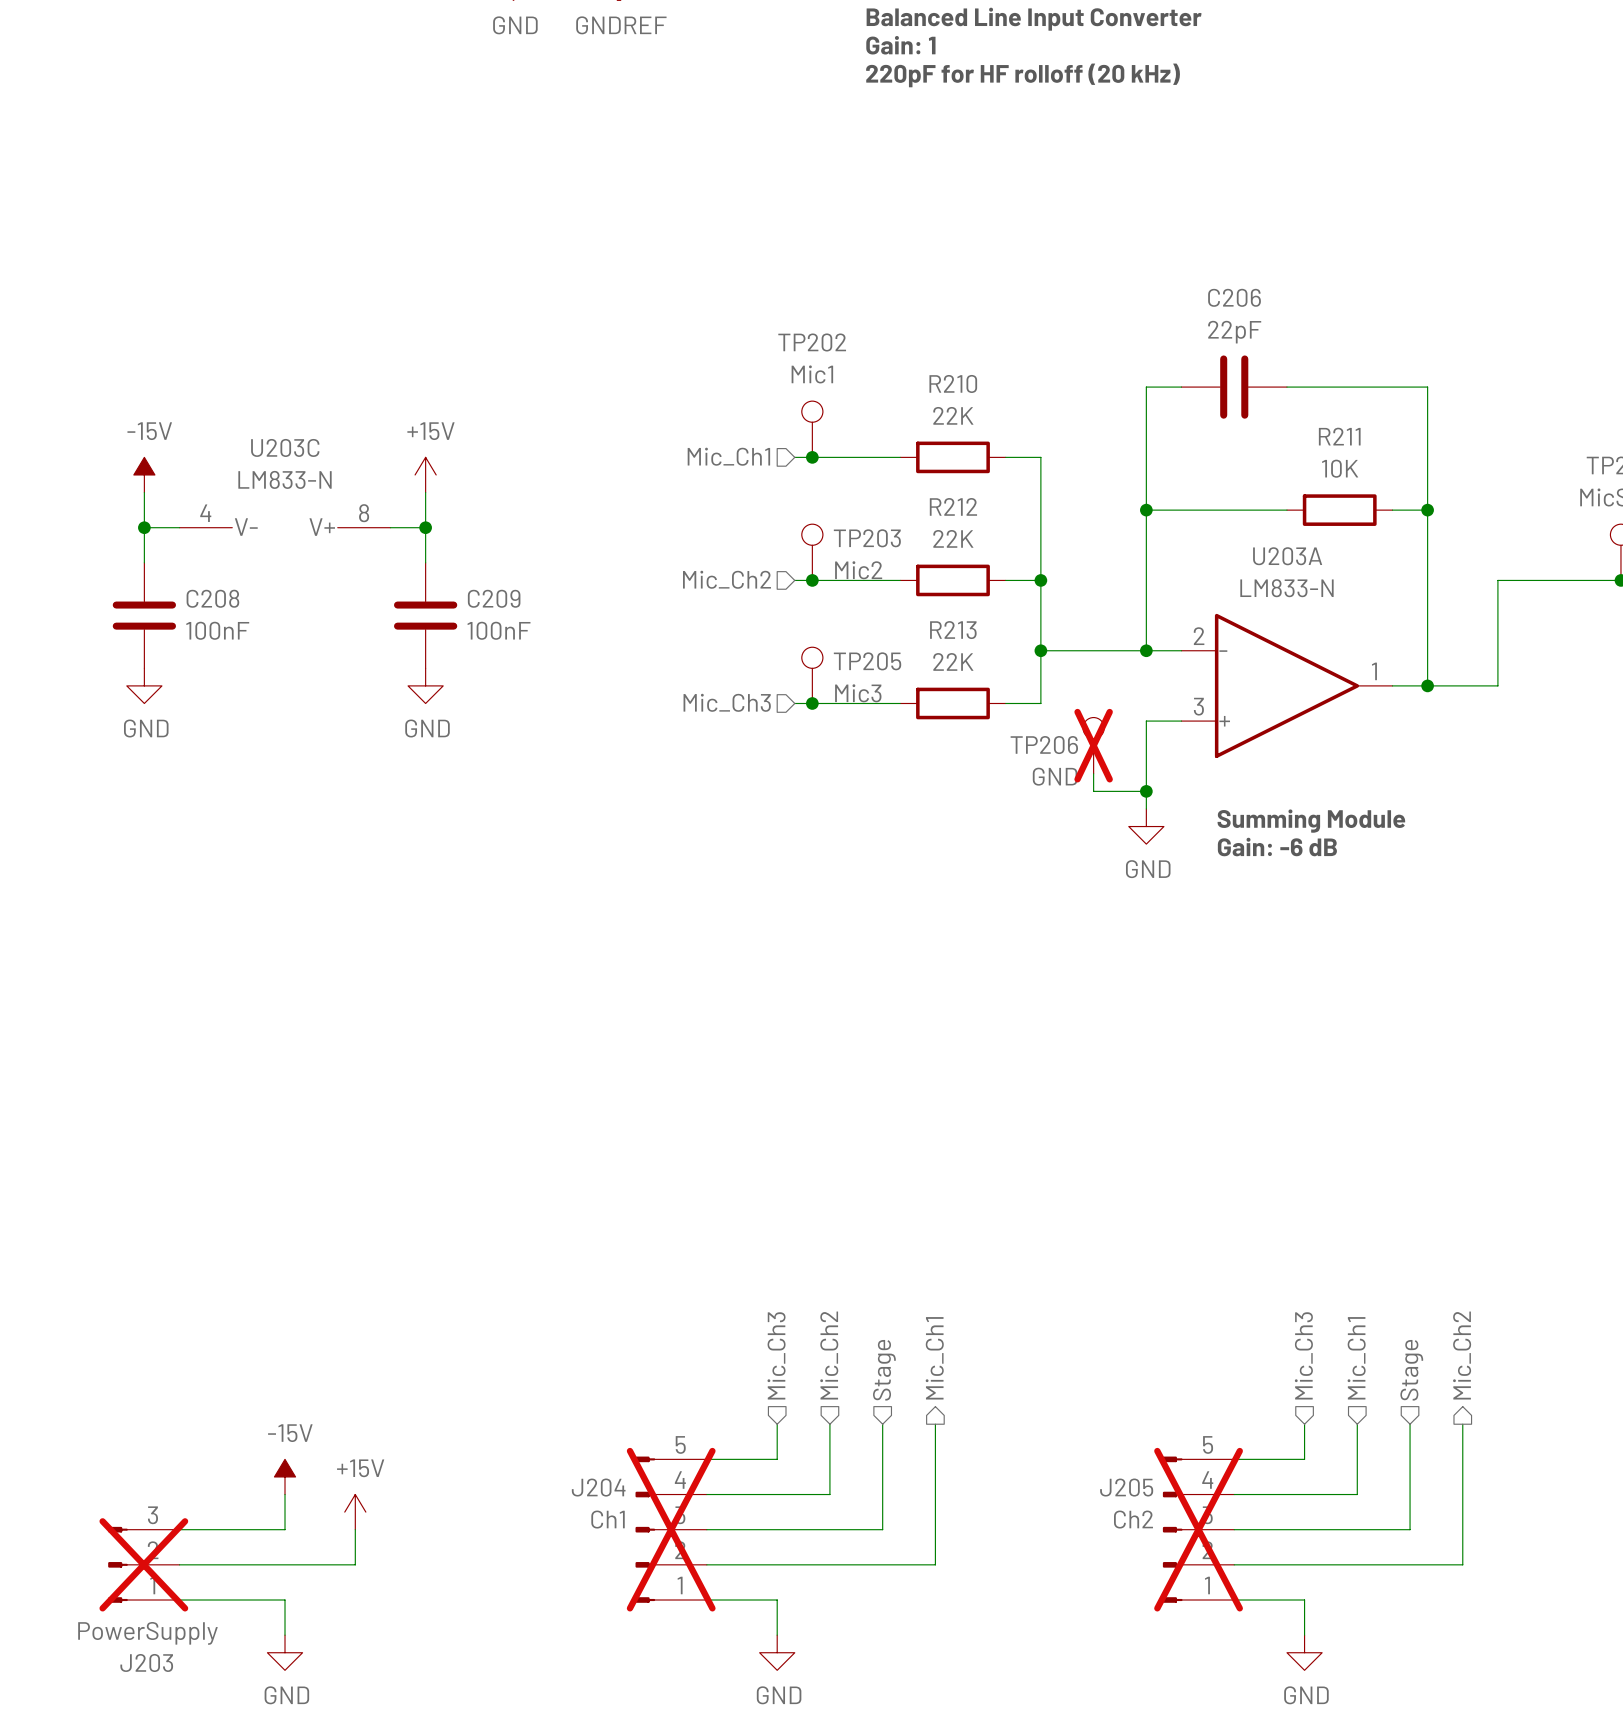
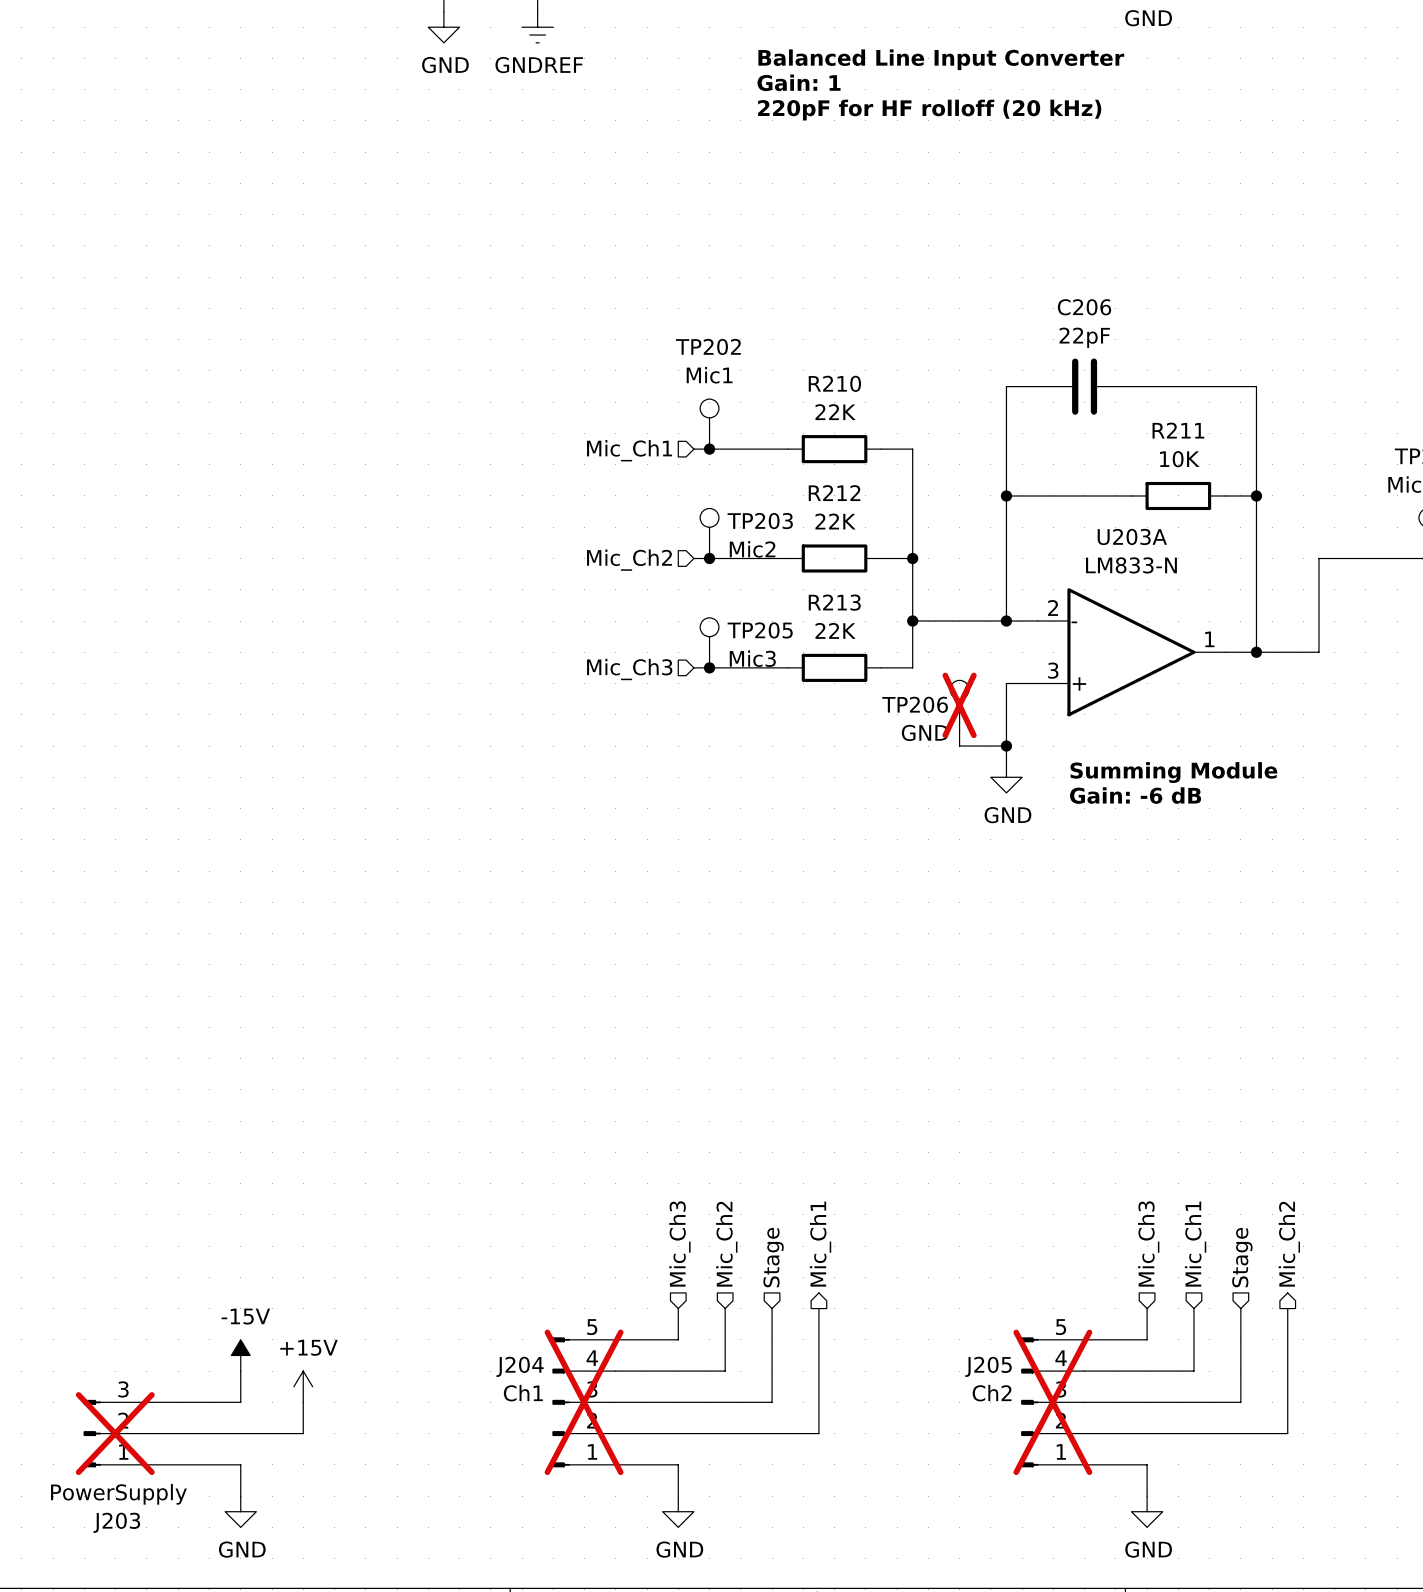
power symbol: -15V (144, 474) -> none
power symbol: +15V (425, 474) -> none
wire: (144, 492) (144, 562) -> none
wire: (425, 492) (425, 562) -> none
wire: (144, 527) (179, 527) -> none
junction: (144, 527) -> none
U203C: LM833-N (285, 527) -> none
wire: (390, 527) (425, 527) -> none
junction: (425, 527) -> none
C208: 100nF (144, 615) -> none
C209: 100nF (425, 615) -> none
power symbol: GND (144, 685) -> none
power symbol: GND (425, 685) -> none

